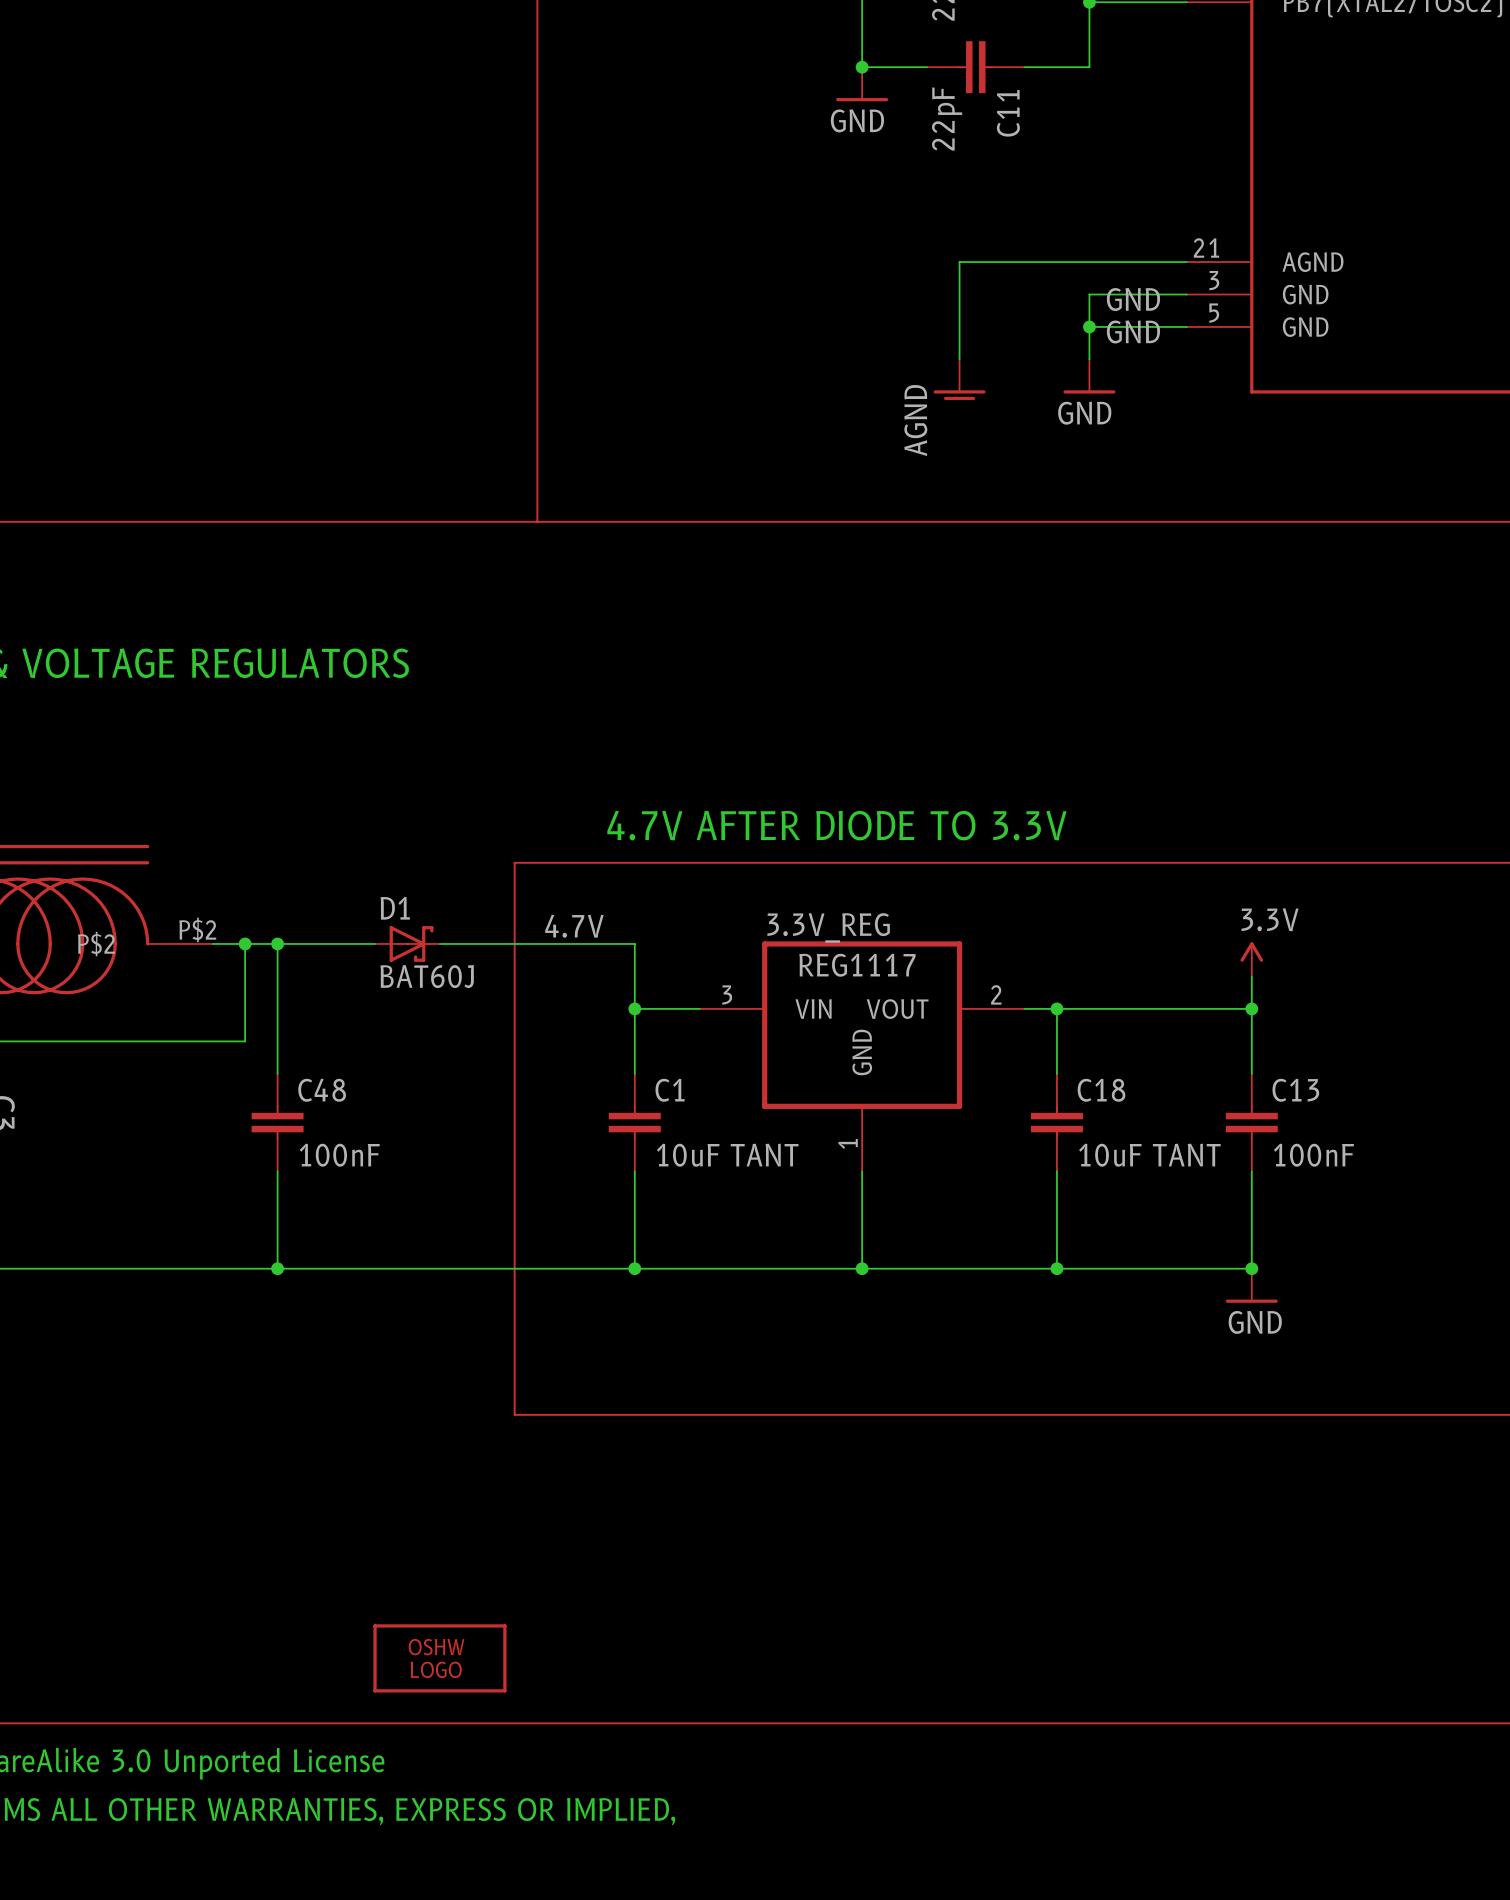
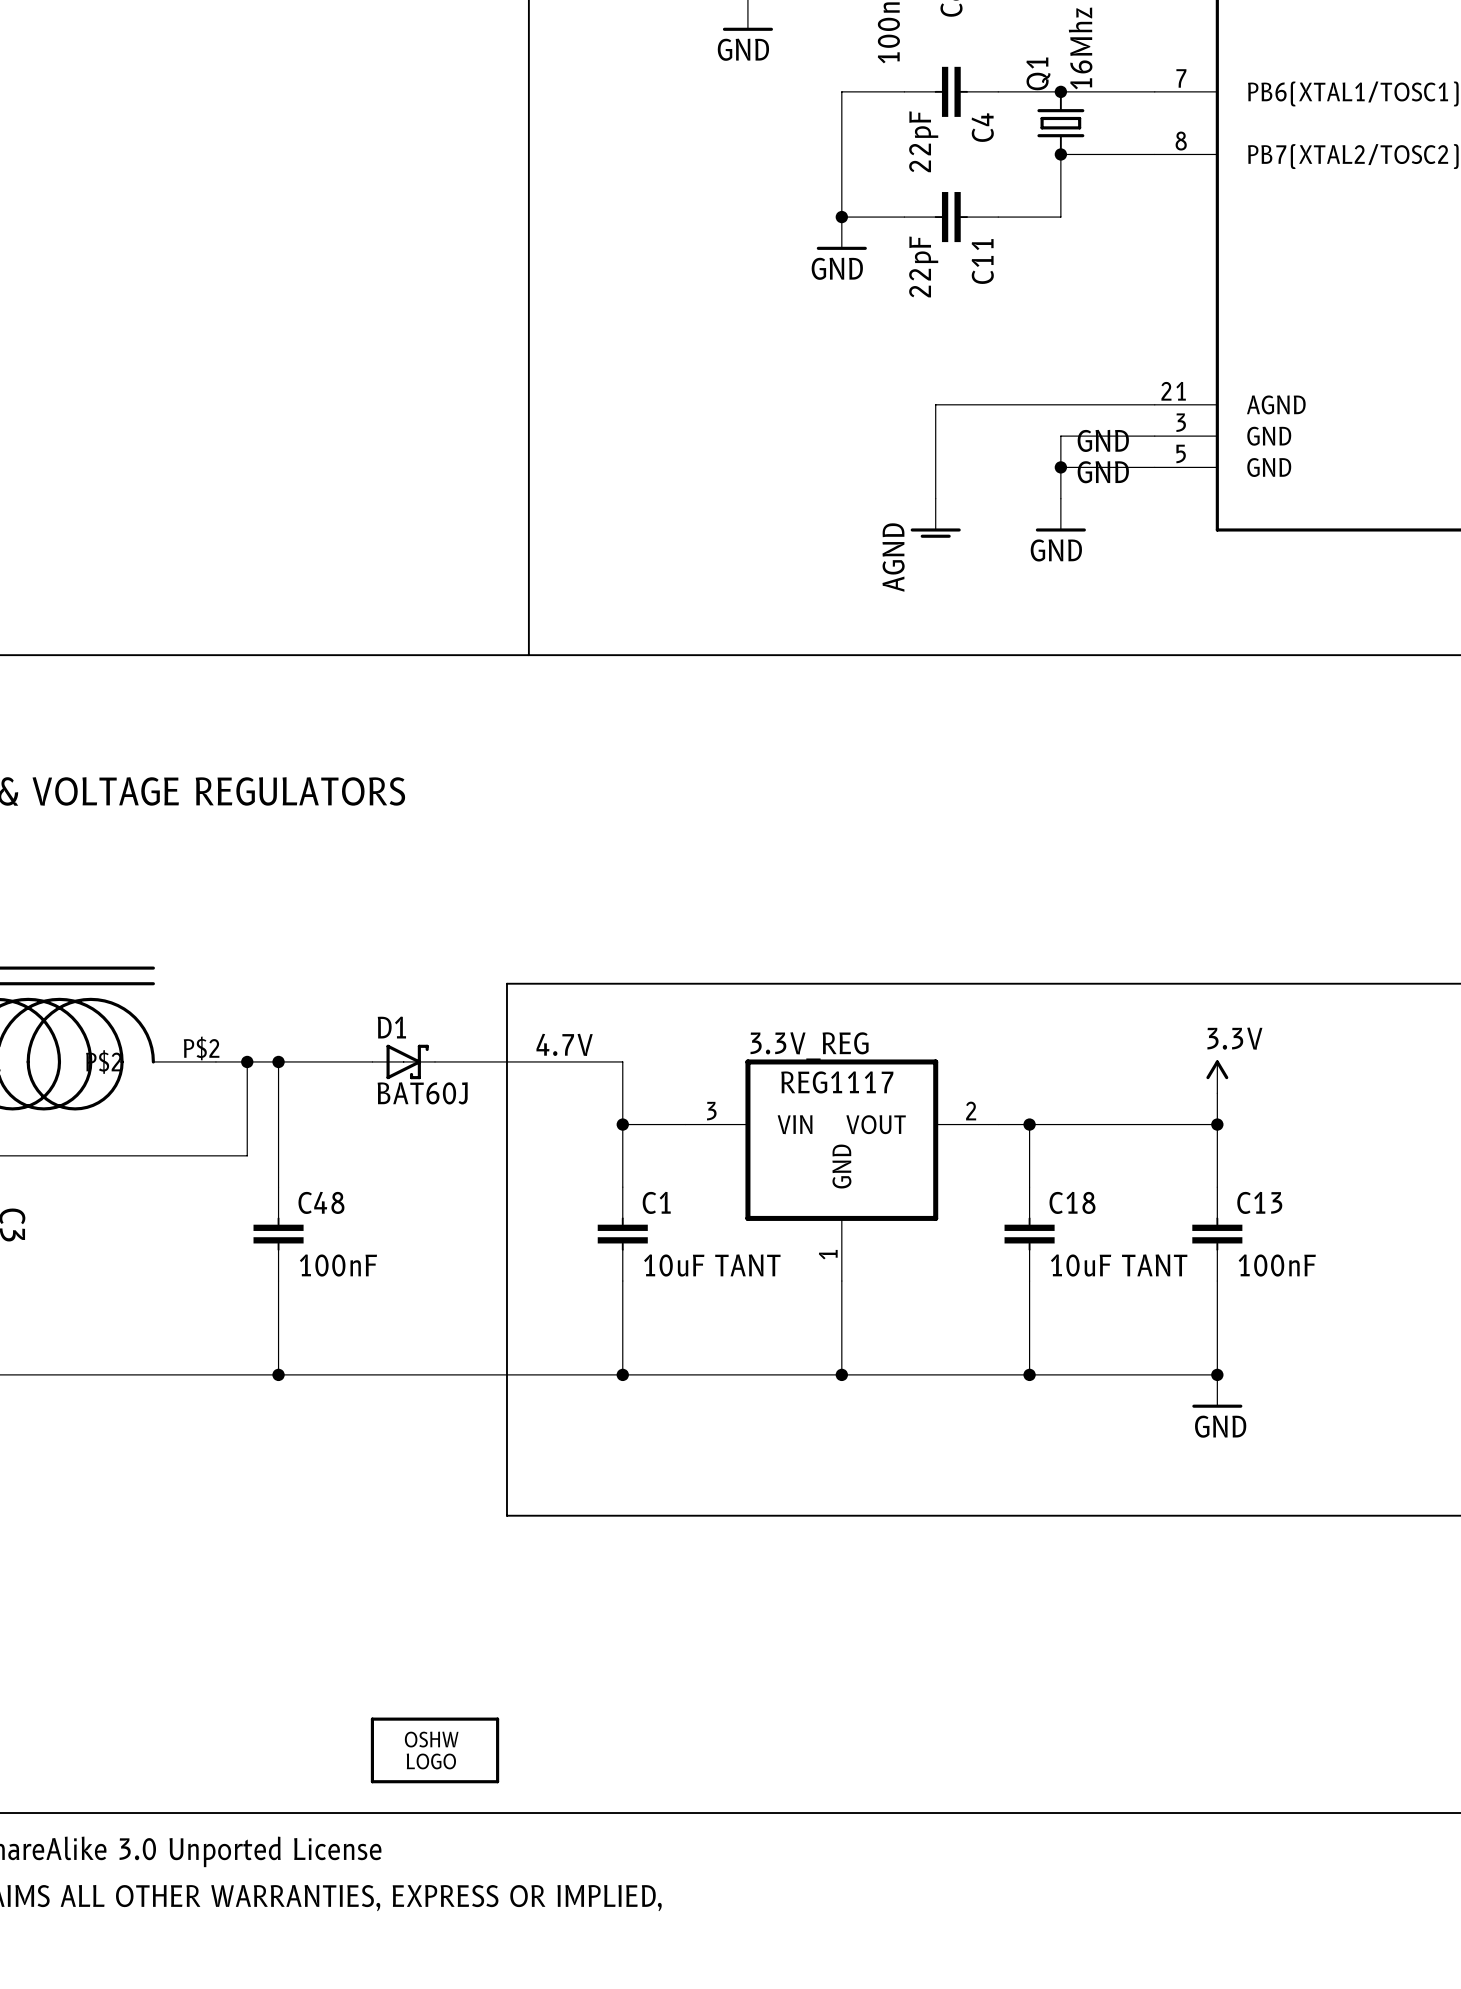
text: 4.7V AFTER DIODE TO 3.3V (836, 825) -> none

